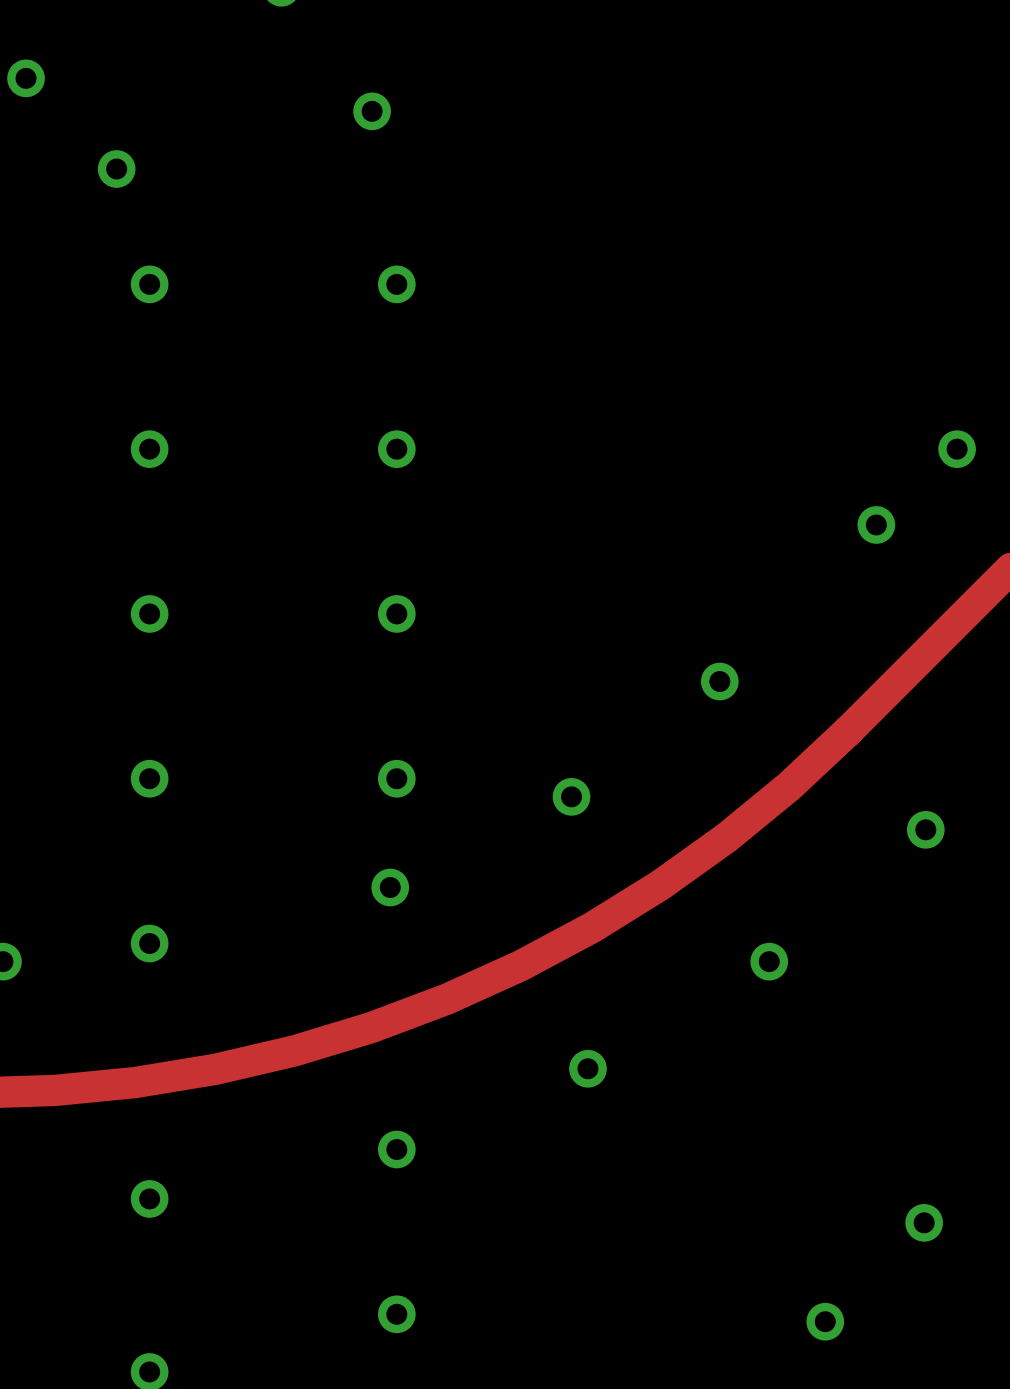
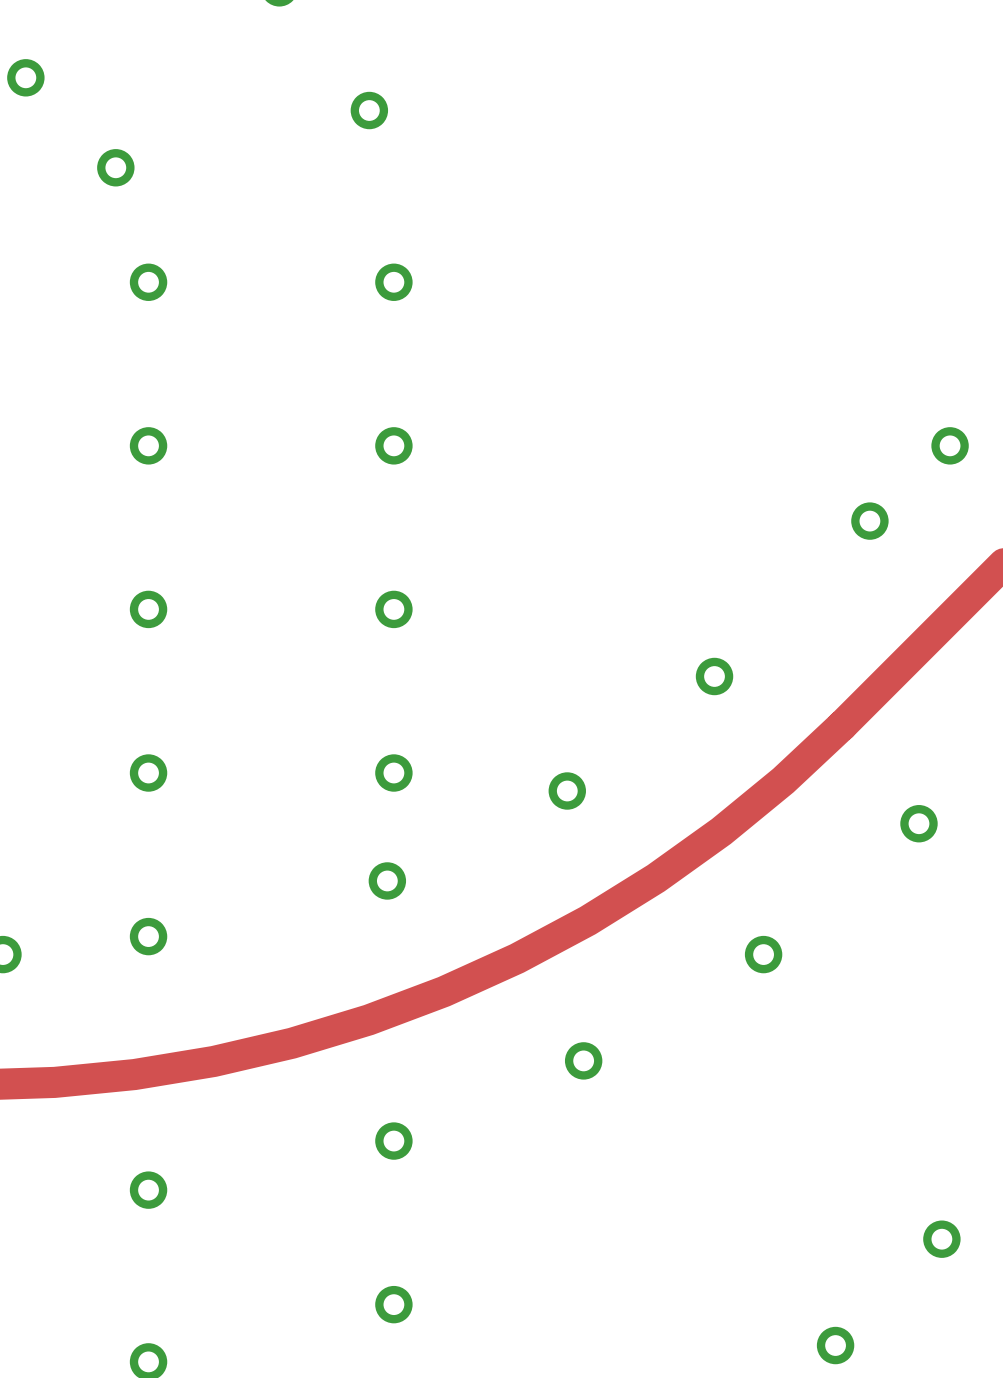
via position: (924, 1222) -> (941, 1239)
via position: (825, 1321) -> (835, 1345)

